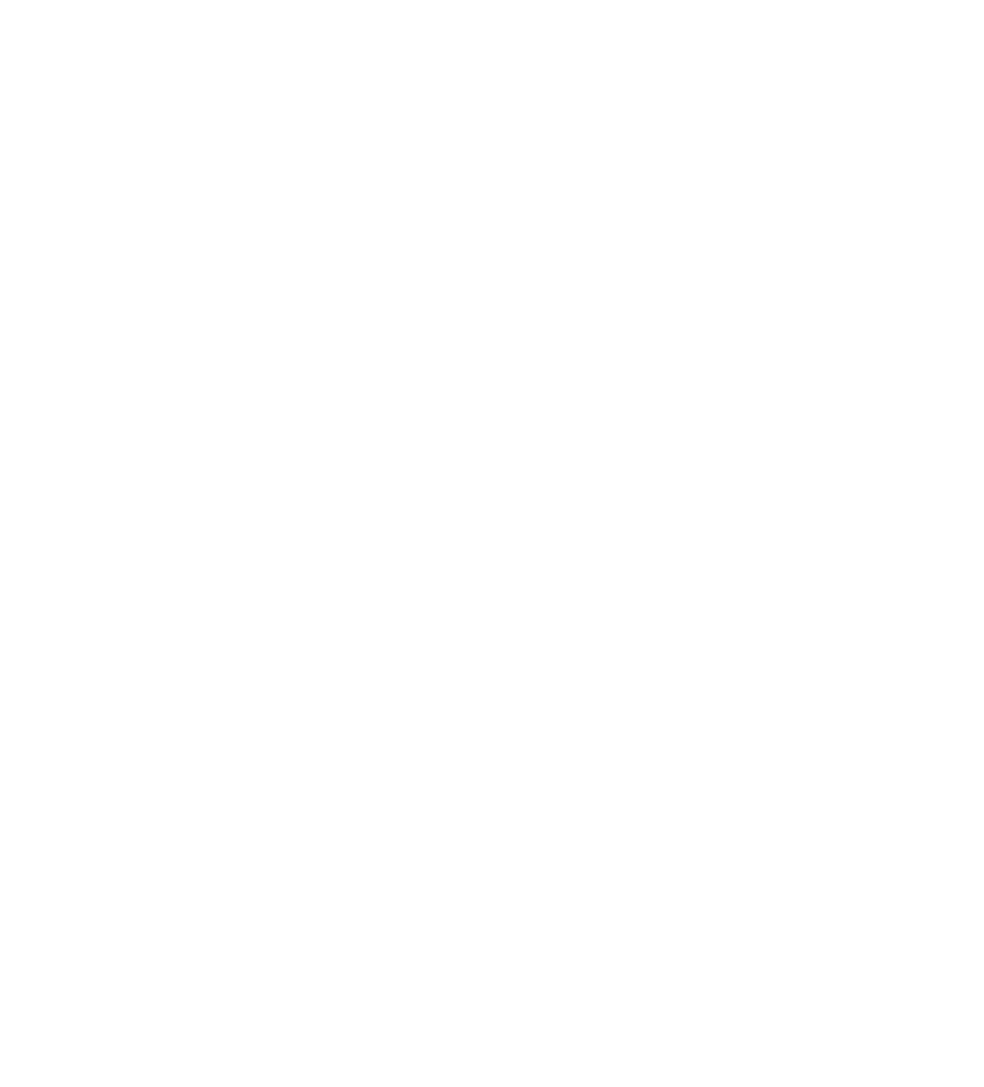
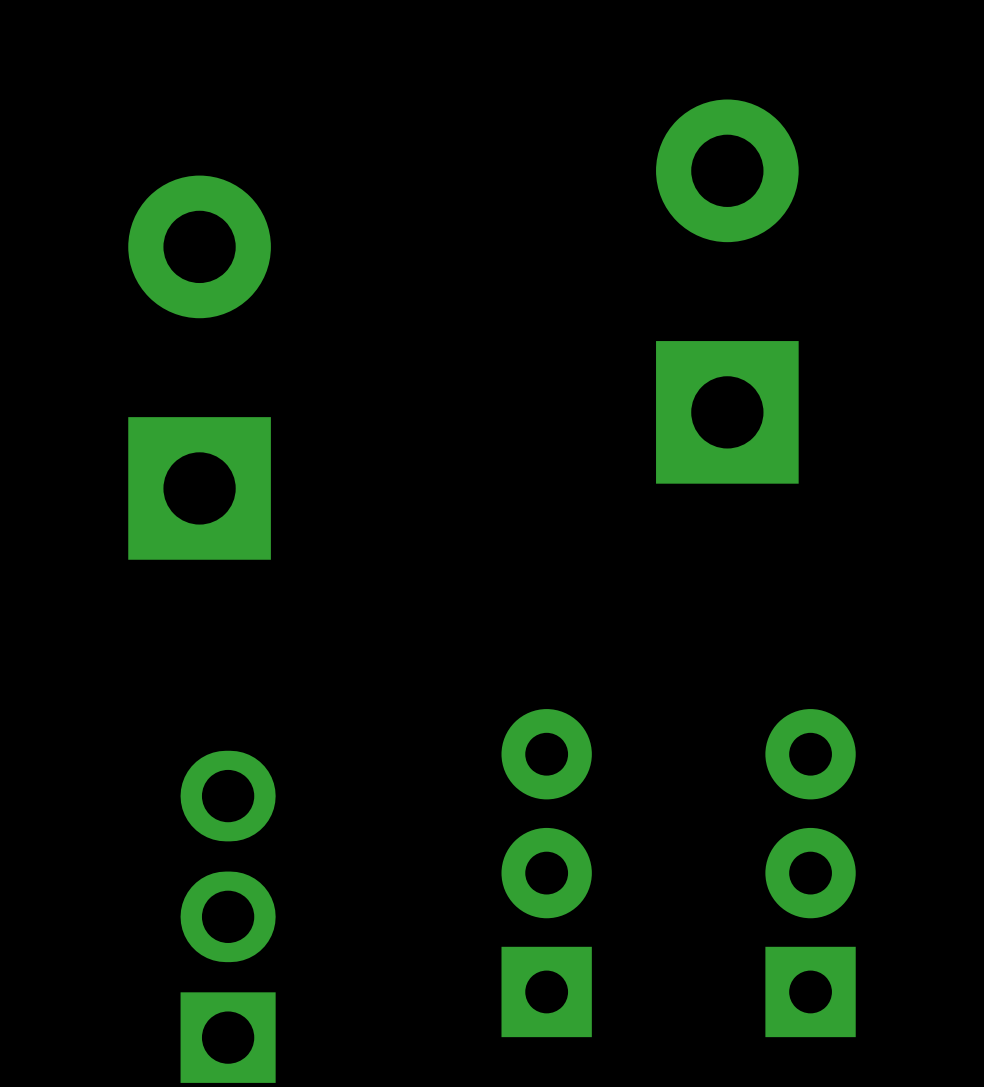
part: none -> (727, 291)
part: none -> (199, 367)
part: none -> (546, 873)
part: none -> (810, 873)
part: none -> (228, 916)

